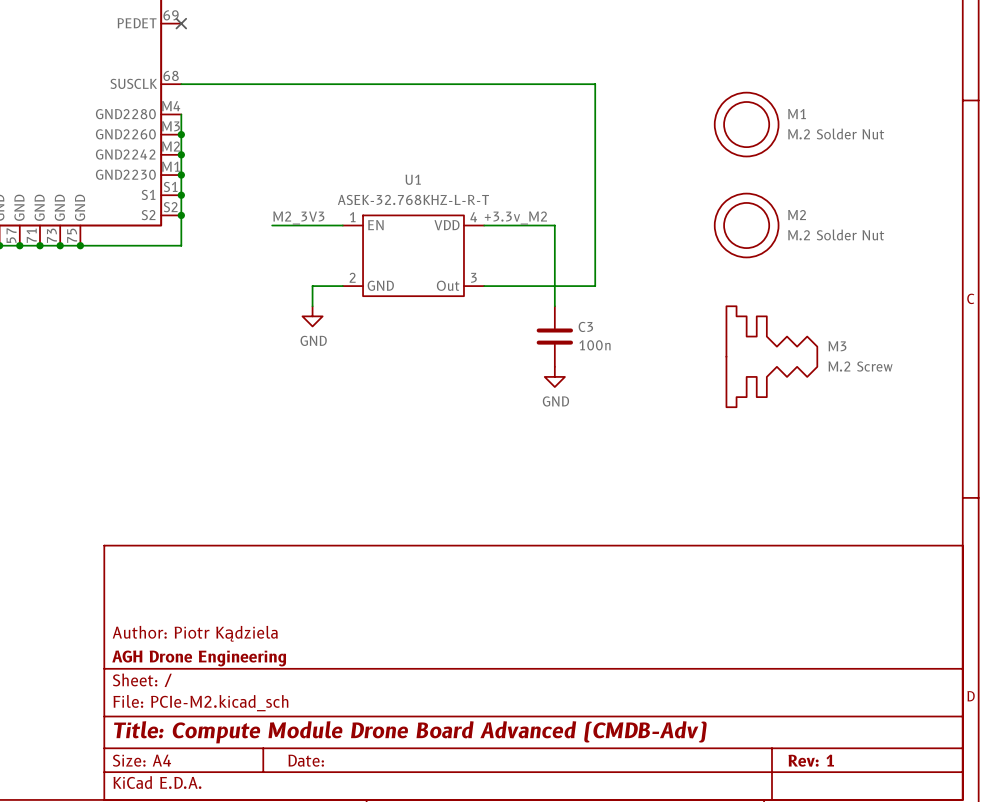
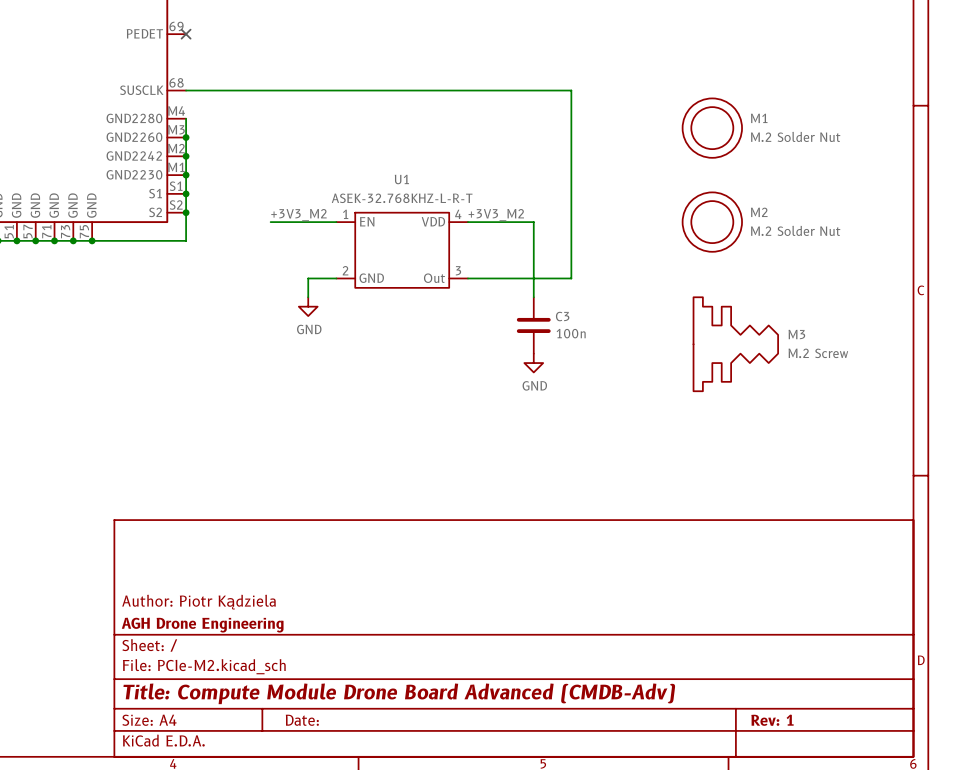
label: M2_3V3 (298, 218) -> +3V3_M2 (298, 215)
label: +3.3v_M2 (515, 218) -> +3V3_M2 (496, 215)

